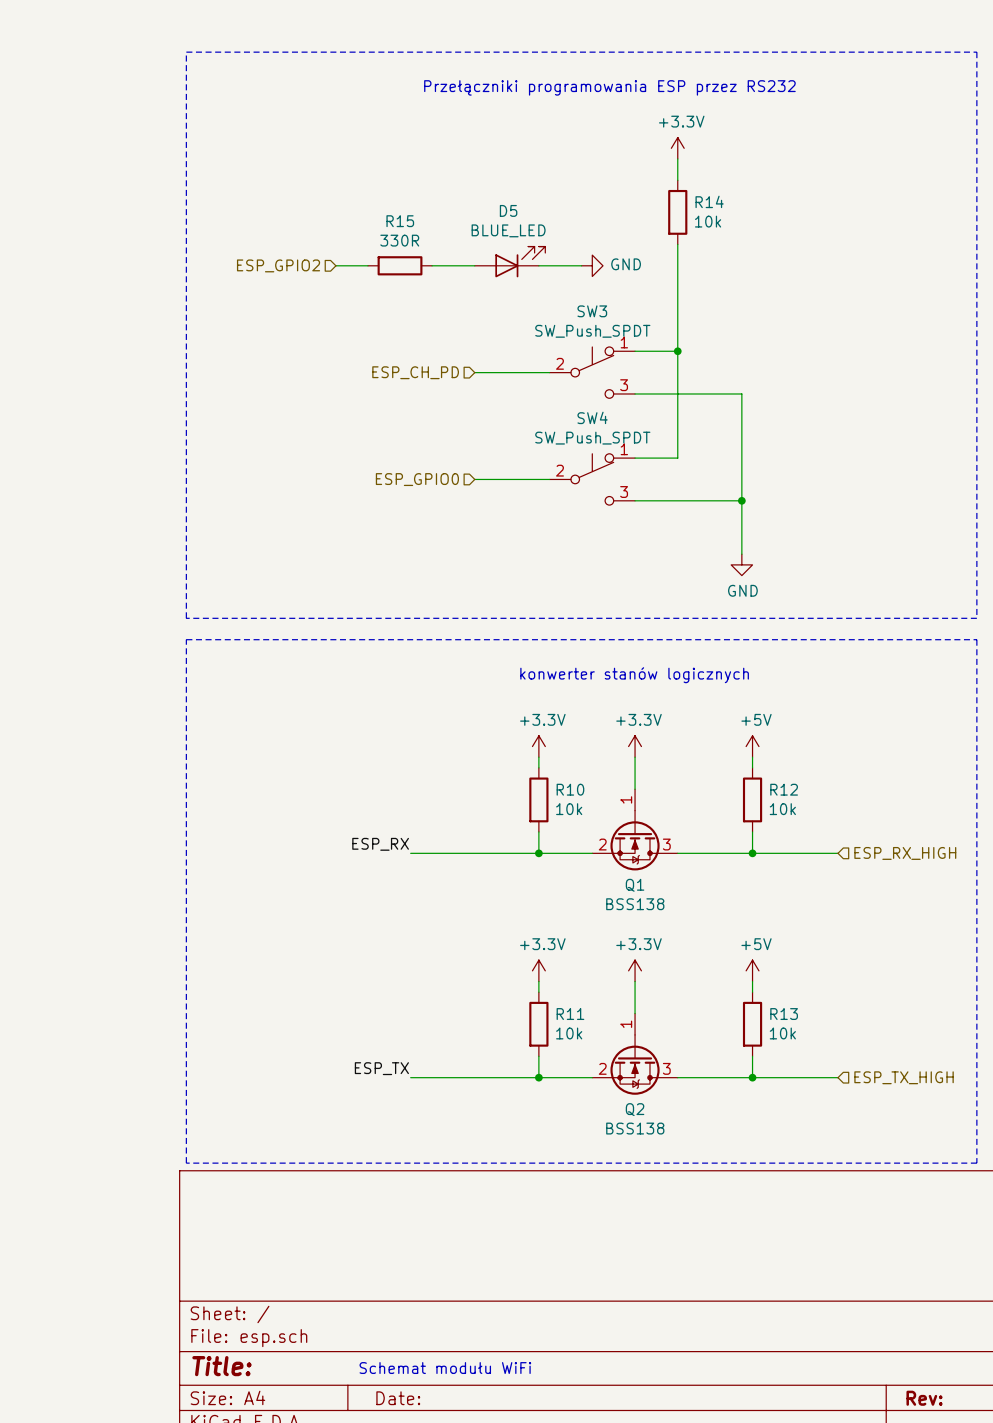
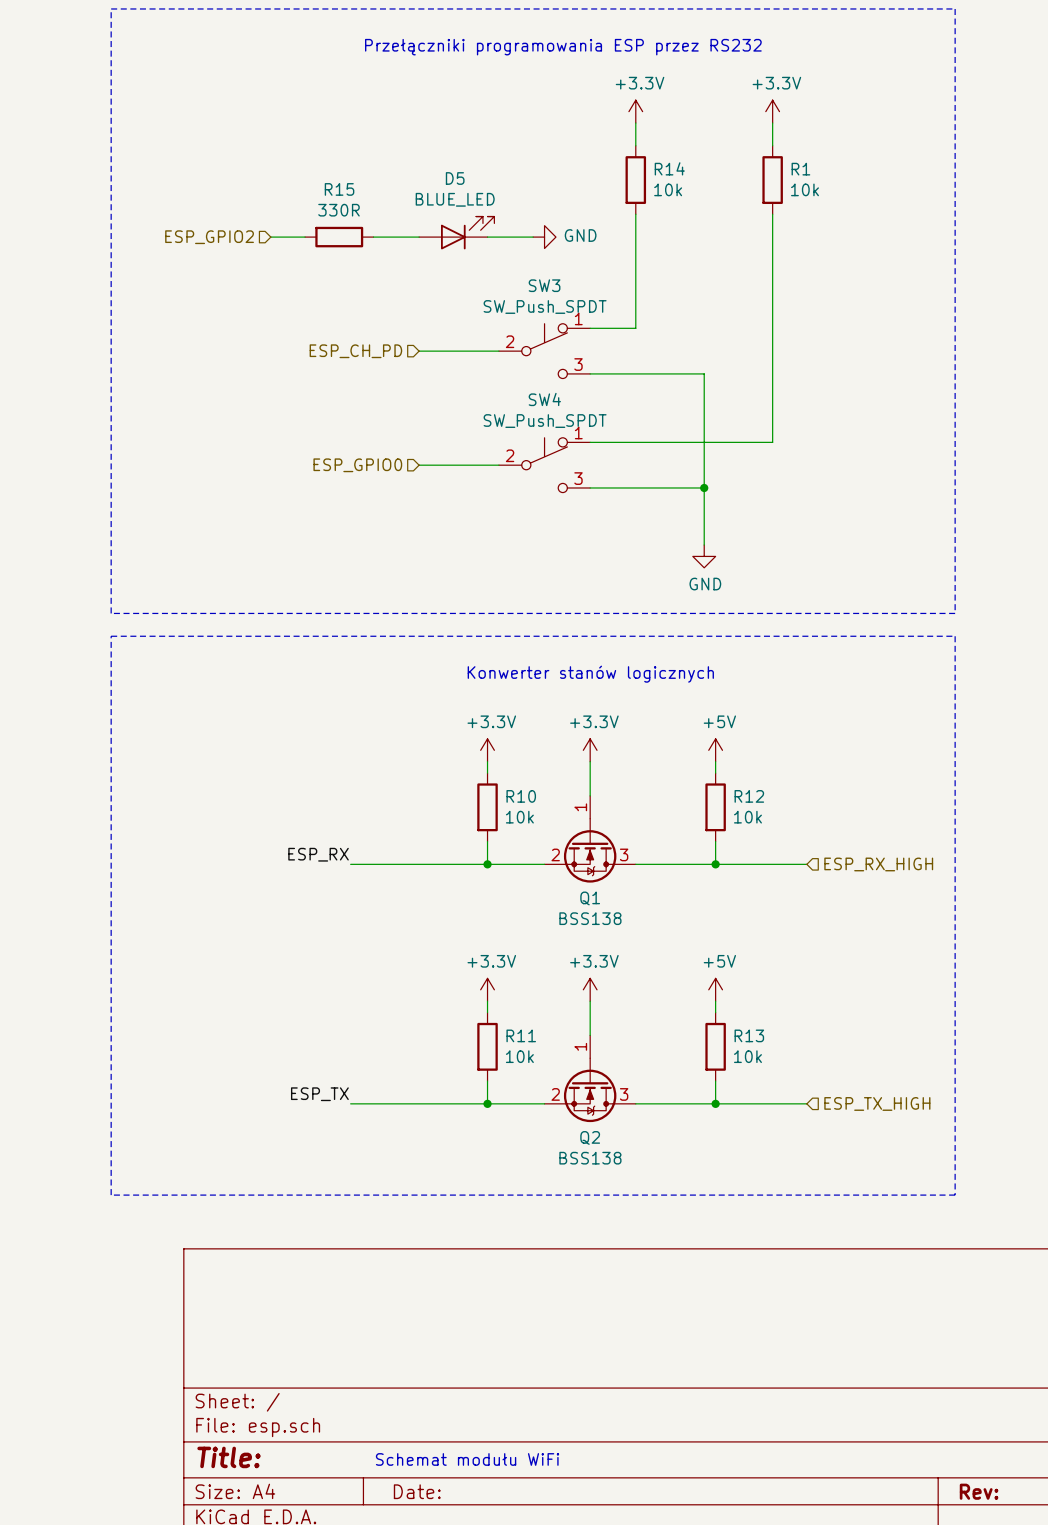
line: (186, 52) (976, 52) (976, 618) (186, 618) (186, 52) -> (111, 8) (955, 8) (955, 613) (111, 613) (111, 8)
text position: Przełączniki programowania ESP przez RS232 (609, 87) -> Przełączniki programowania ESP przez RS232 (563, 47)
power symbol: none -> +3.3V (635, 111)
power symbol: none -> +3.3V (772, 111)
wire: none -> (772, 123) (772, 145)
power symbol: +3.3V (677, 148) -> none
wire: (677, 158) (677, 180) -> (635, 123) (635, 145)
R1: none -> 10k (772, 180)
wire: none -> (635, 214) (635, 328) (590, 328)
wire: none -> (772, 214) (772, 442) (590, 442)
R14 position: (677, 212) -> (635, 180)
wire: (677, 244) (677, 458) (667, 458) -> none
D5 position: (510, 261) -> (456, 232)
hierarchical label position: ESP_GPIO2 (278, 265) -> ESP_GPIO2 (209, 237)
wire: (335, 265) (367, 265) -> (270, 237) (305, 237)
R15 position: (400, 265) -> (339, 237)
wire: (432, 265) (474, 265) -> (373, 237) (419, 237)
wire: (538, 265) (581, 265) -> (487, 237) (533, 237)
power symbol position: GND (592, 265) -> GND (544, 237)
wire: none -> (590, 373) (670, 373)
wire: (667, 351) (677, 351) -> (704, 373) (704, 545)
junction: (677, 351) -> none
hierarchical label position: ESP_CH_PD (415, 372) -> ESP_CH_PD (355, 351)
wire: (474, 372) (549, 372) -> (419, 351) (498, 351)
SW3 position: (592, 372) -> (544, 351)
wire: (635, 393) (741, 393) (741, 554) -> none
wire: none -> (590, 487) (670, 487)
junction: none -> (704, 487)
hierarchical label position: ESP_GPIO0 (417, 479) -> ESP_GPIO0 (357, 465)
wire: (474, 479) (549, 479) -> (419, 465) (498, 465)
SW4 position: (592, 479) -> (544, 465)
wire: (635, 500) (741, 500) -> none
junction: (741, 500) -> none
power symbol position: GND (741, 564) -> GND (704, 556)
text: none -> Konwerter stanów logicznych (590, 674)
line: (186, 639) (186, 1163) (976, 1163) (976, 639) (186, 639) -> (111, 636) (111, 1195) (955, 1195) (955, 636) (111, 636)
text: konwerter stanów logicznych (634, 675) -> none
power symbol: none -> +3.3V (487, 750)
power symbol: none -> +3.3V (590, 750)
power symbol: +3.3V (538, 746) -> none
power symbol: +3.3V (635, 746) -> none
power symbol position: +5V (752, 746) -> +5V (715, 750)
wire: (538, 757) (538, 767) -> (487, 761) (487, 773)
wire: (635, 757) (635, 789) -> (590, 761) (590, 795)
wire: (752, 757) (752, 767) -> (715, 761) (715, 773)
R10 position: (538, 799) -> (487, 807)
R12 position: (752, 799) -> (715, 807)
junction: none -> (487, 864)
junction: none -> (715, 864)
Q1 position: (635, 829) -> (590, 839)
wire: (538, 831) (538, 853) -> (487, 841) (487, 864)
wire: (752, 831) (752, 853) -> (715, 841) (715, 864)
label position: ESP_RX (380, 844) -> ESP_RX (318, 854)
wire: (410, 853) (592, 853) -> (350, 864) (544, 864)
junction: (538, 853) -> none
wire: (677, 853) (838, 853) -> (635, 864) (806, 864)
junction: (752, 853) -> none
hierarchical label position: ESP_RX_HIGH (905, 853) -> ESP_RX_HIGH (878, 864)
power symbol: none -> +3.3V (487, 989)
power symbol: none -> +3.3V (590, 989)
power symbol: +3.3V (538, 970) -> none
power symbol: +3.3V (635, 970) -> none
power symbol position: +5V (752, 970) -> +5V (715, 989)
wire: (538, 981) (538, 992) -> (487, 1001) (487, 1012)
wire: (635, 981) (635, 1013) -> (590, 1001) (590, 1035)
wire: (752, 981) (752, 992) -> (715, 1001) (715, 1012)
R11 position: (538, 1024) -> (487, 1046)
R13 position: (752, 1024) -> (715, 1046)
junction: none -> (487, 1103)
junction: none -> (715, 1103)
Q2 position: (635, 1054) -> (590, 1078)
wire: (538, 1056) (538, 1077) -> (487, 1081) (487, 1103)
wire: (752, 1056) (752, 1077) -> (715, 1081) (715, 1103)
label position: ESP_TX (381, 1068) -> ESP_TX (319, 1094)
wire: (410, 1077) (592, 1077) -> (350, 1103) (544, 1103)
junction: (538, 1077) -> none
wire: (677, 1077) (838, 1077) -> (635, 1103) (806, 1103)
junction: (752, 1077) -> none
hierarchical label position: ESP_TX_HIGH (904, 1077) -> ESP_TX_HIGH (877, 1103)

